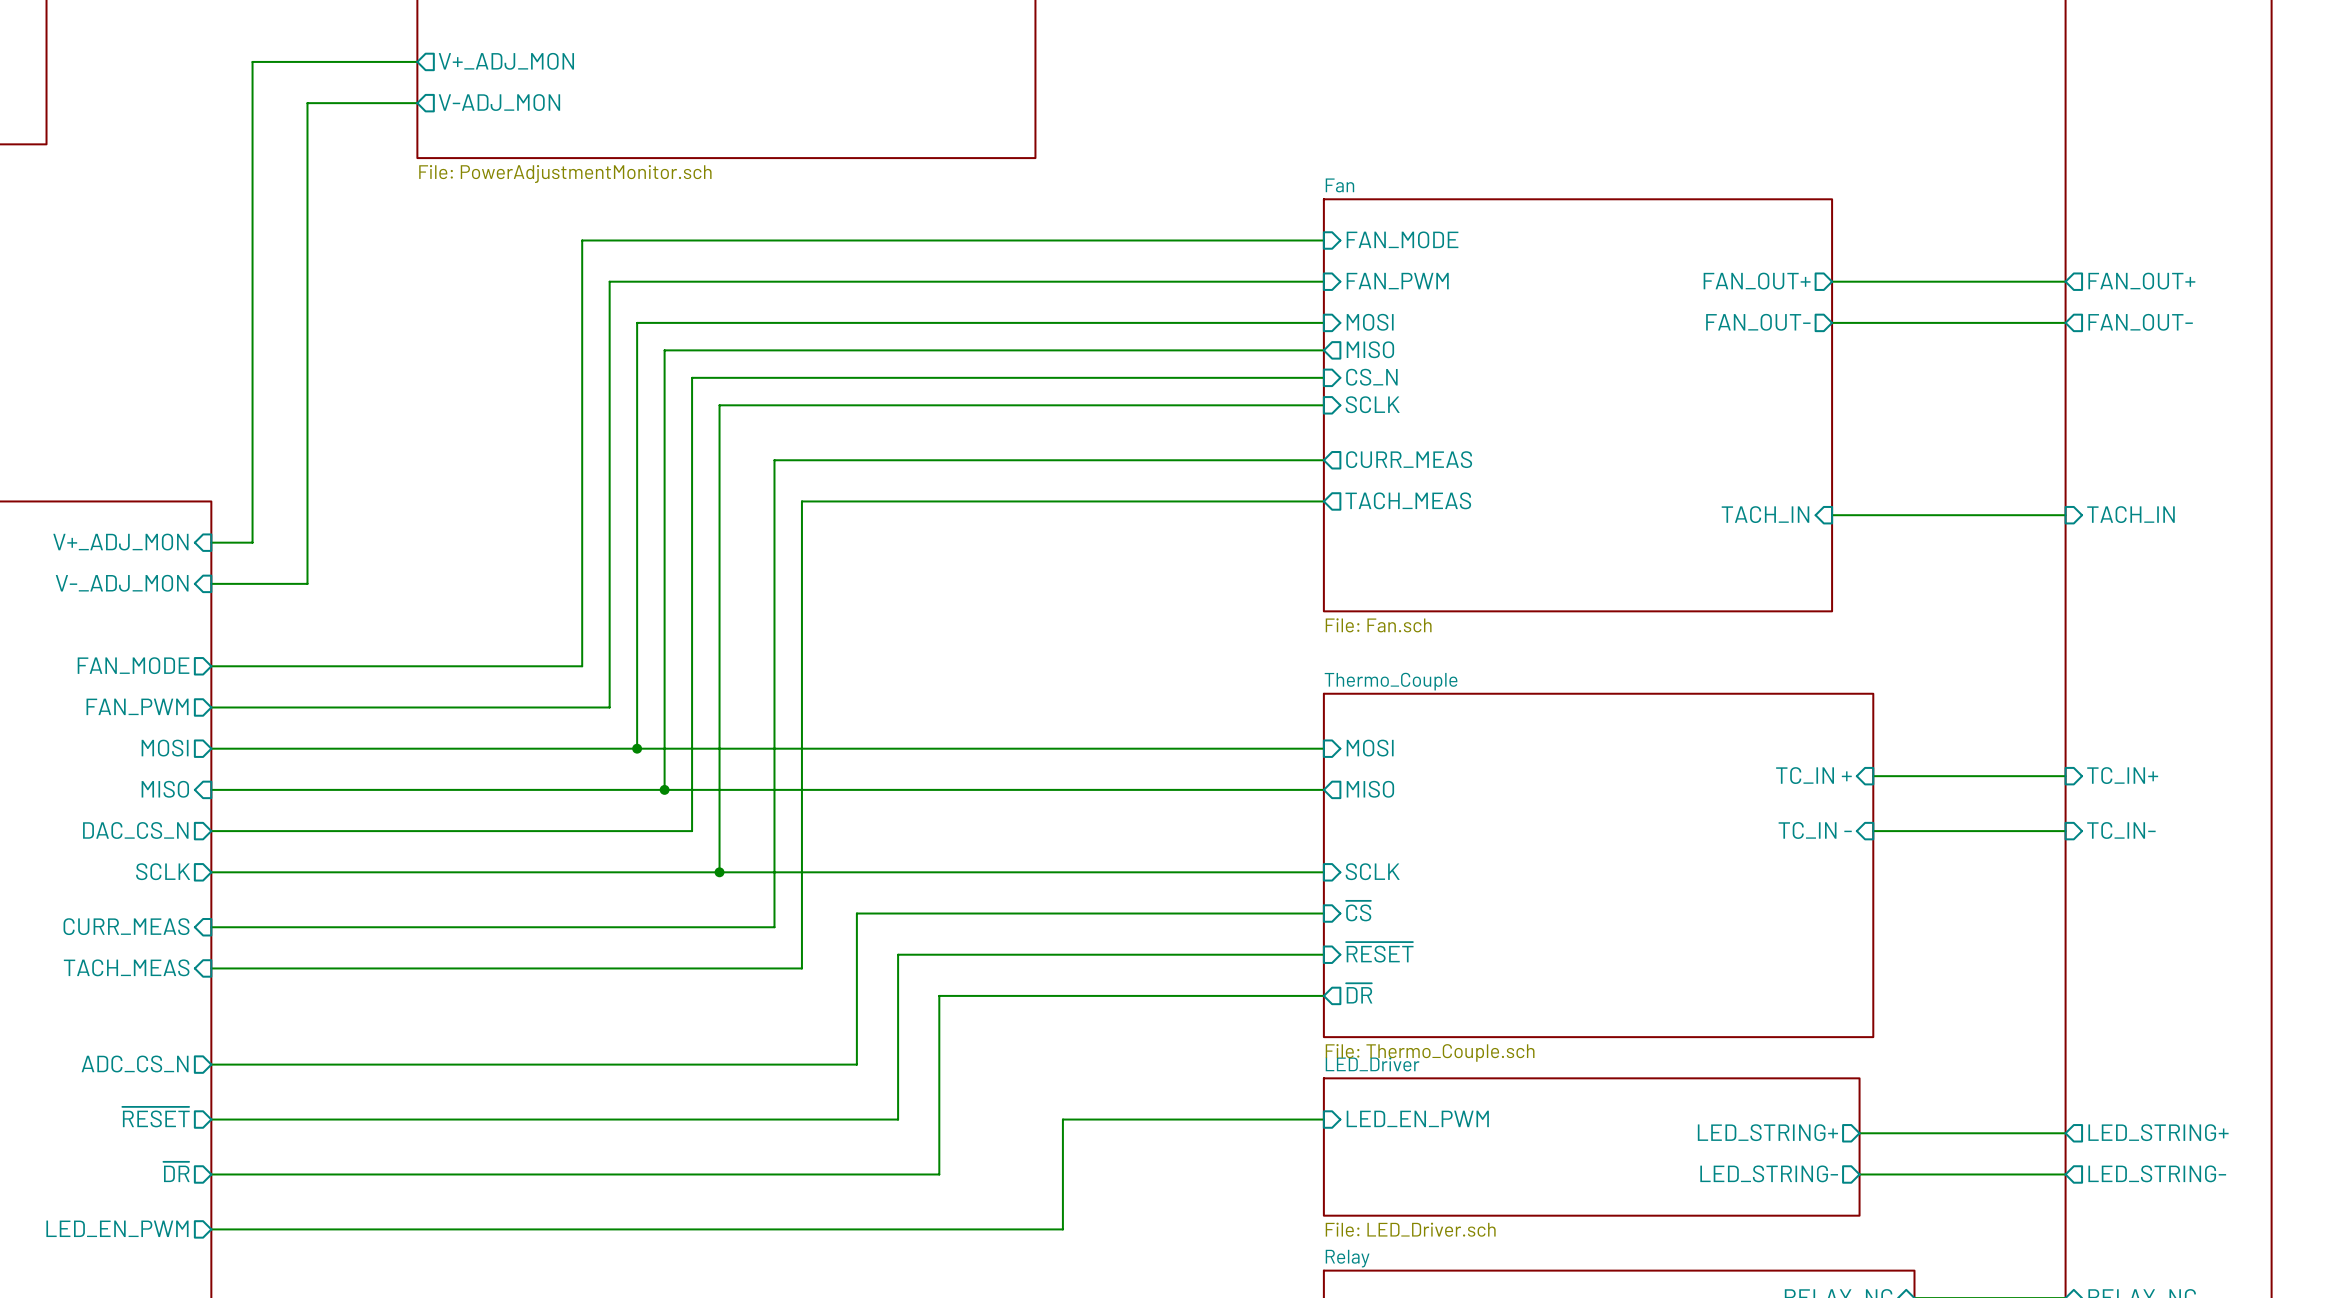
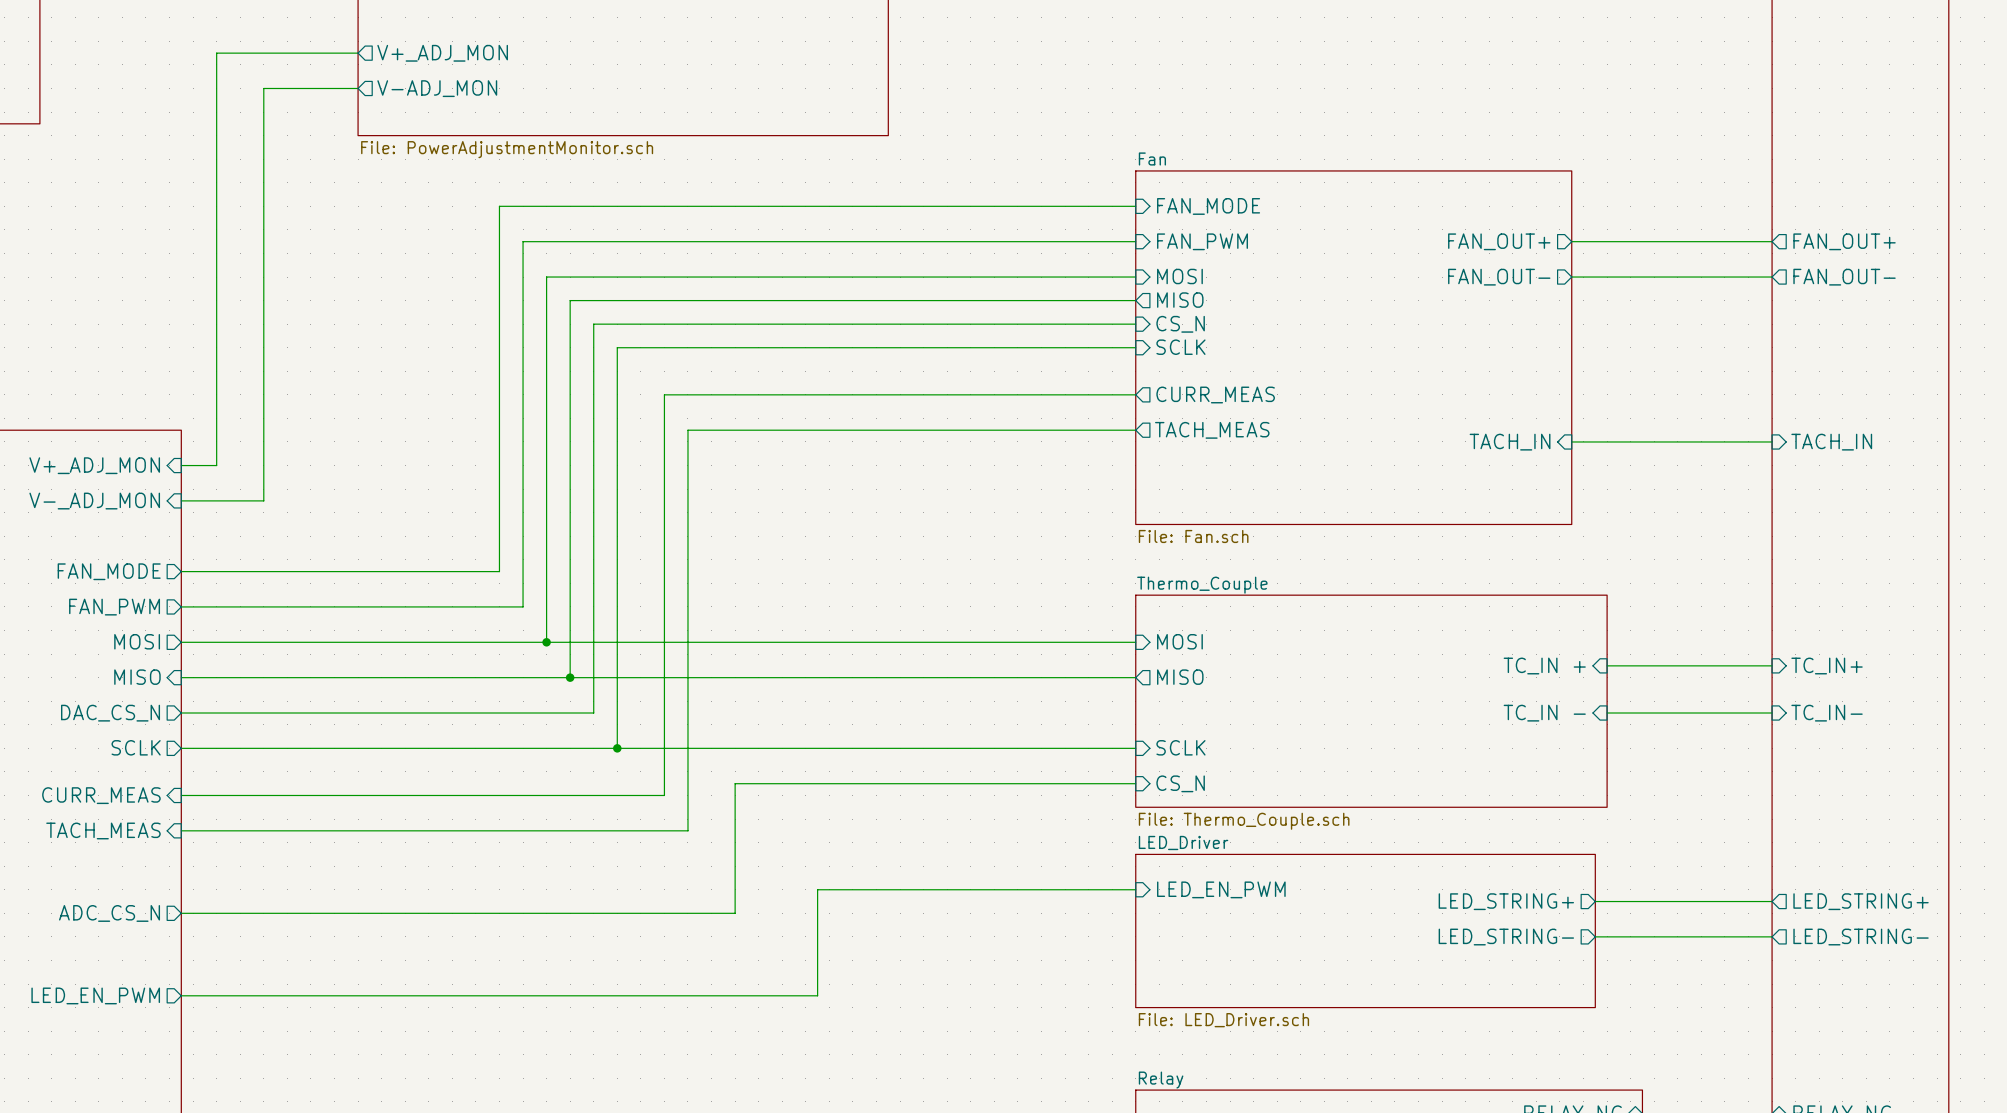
sheet Thermo_Couple: none -> File: Thermo_Couple.sch (1371, 701)
sheet Thermo_Couple: File: Thermo_Couple.sch (1598, 865) -> none
sheet pin: ~{CS} (1358, 911) -> CS_N (1180, 783)
sheet pin: ~{RESET} (1379, 952) -> none
wire: (1323, 954) (898, 954) (898, 1119) (211, 1119) -> none
sheet pin: ~{DR} (1359, 993) -> none
wire: (1323, 995) (939, 995) (939, 1174) (211, 1174) -> none
wire: none -> (1135, 889) (817, 889) (817, 995) (181, 995)
sheet LED_Driver: none -> File: LED_Driver.sch (1365, 930)
sheet pin: ~{RESET} (156, 1117) -> none
sheet pin position: LED_EN_PWM (1417, 1118) -> LED_EN_PWM (1221, 889)
wire: (1323, 1119) (1062, 1119) (1062, 1229) (211, 1229) -> none
sheet pin position: LED_STRING+ (1767, 1132) -> LED_STRING+ (1506, 901)
sheet pin position: LED_STRING+ (2158, 1132) -> LED_STRING+ (1861, 901)
wire: (1859, 1133) (2065, 1133) -> (1595, 901) (1772, 901)
sheet LED_Driver: File: LED_Driver.sch (1591, 1147) -> none
sheet pin: ~{DR} (176, 1171) -> none
sheet pin position: LED_STRING- (1769, 1173) -> LED_STRING- (1506, 937)
sheet pin position: LED_STRING- (2157, 1173) -> LED_STRING- (1861, 937)
wire: (1859, 1174) (2065, 1174) -> (1595, 936) (1772, 936)
sheet pin position: LED_EN_PWM (117, 1228) -> LED_EN_PWM (95, 995)

